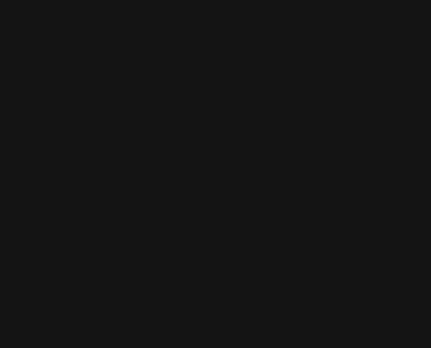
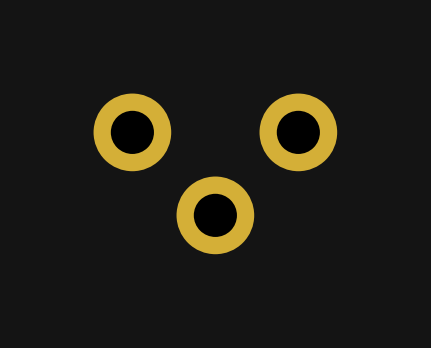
part: none -> (215, 173)

